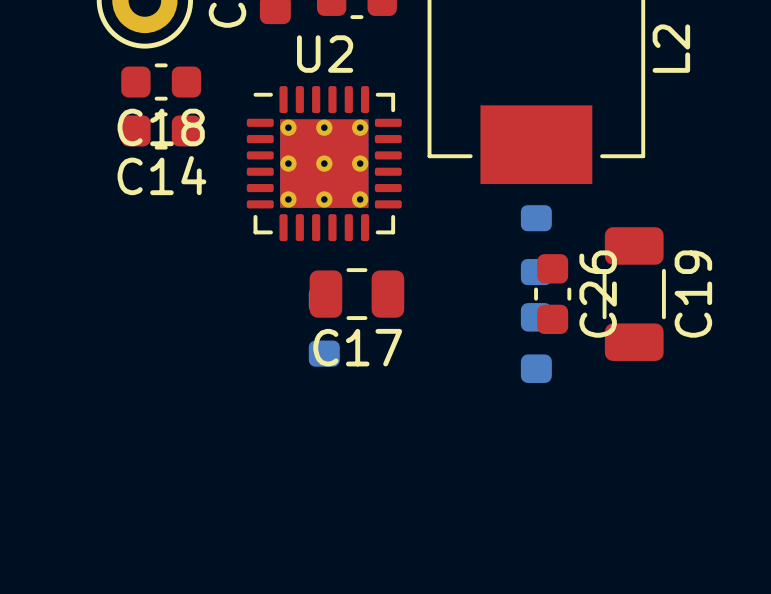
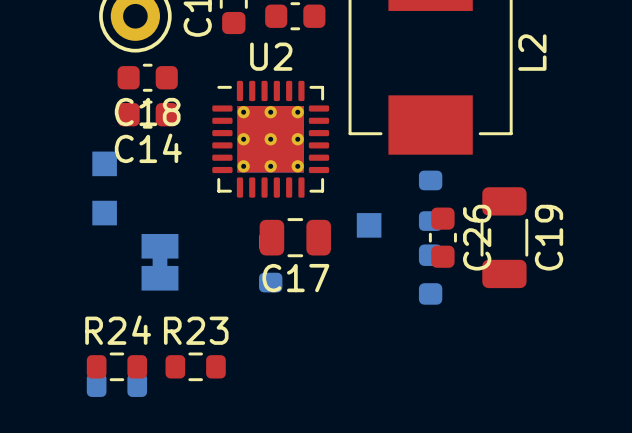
part: none -> (104, 163)
part: none -> (104, 213)
part: none -> (369, 225)
part: none -> (159, 262)
R24: none -> (116, 366)
R23: none -> (195, 366)
part: none -> (116, 385)

